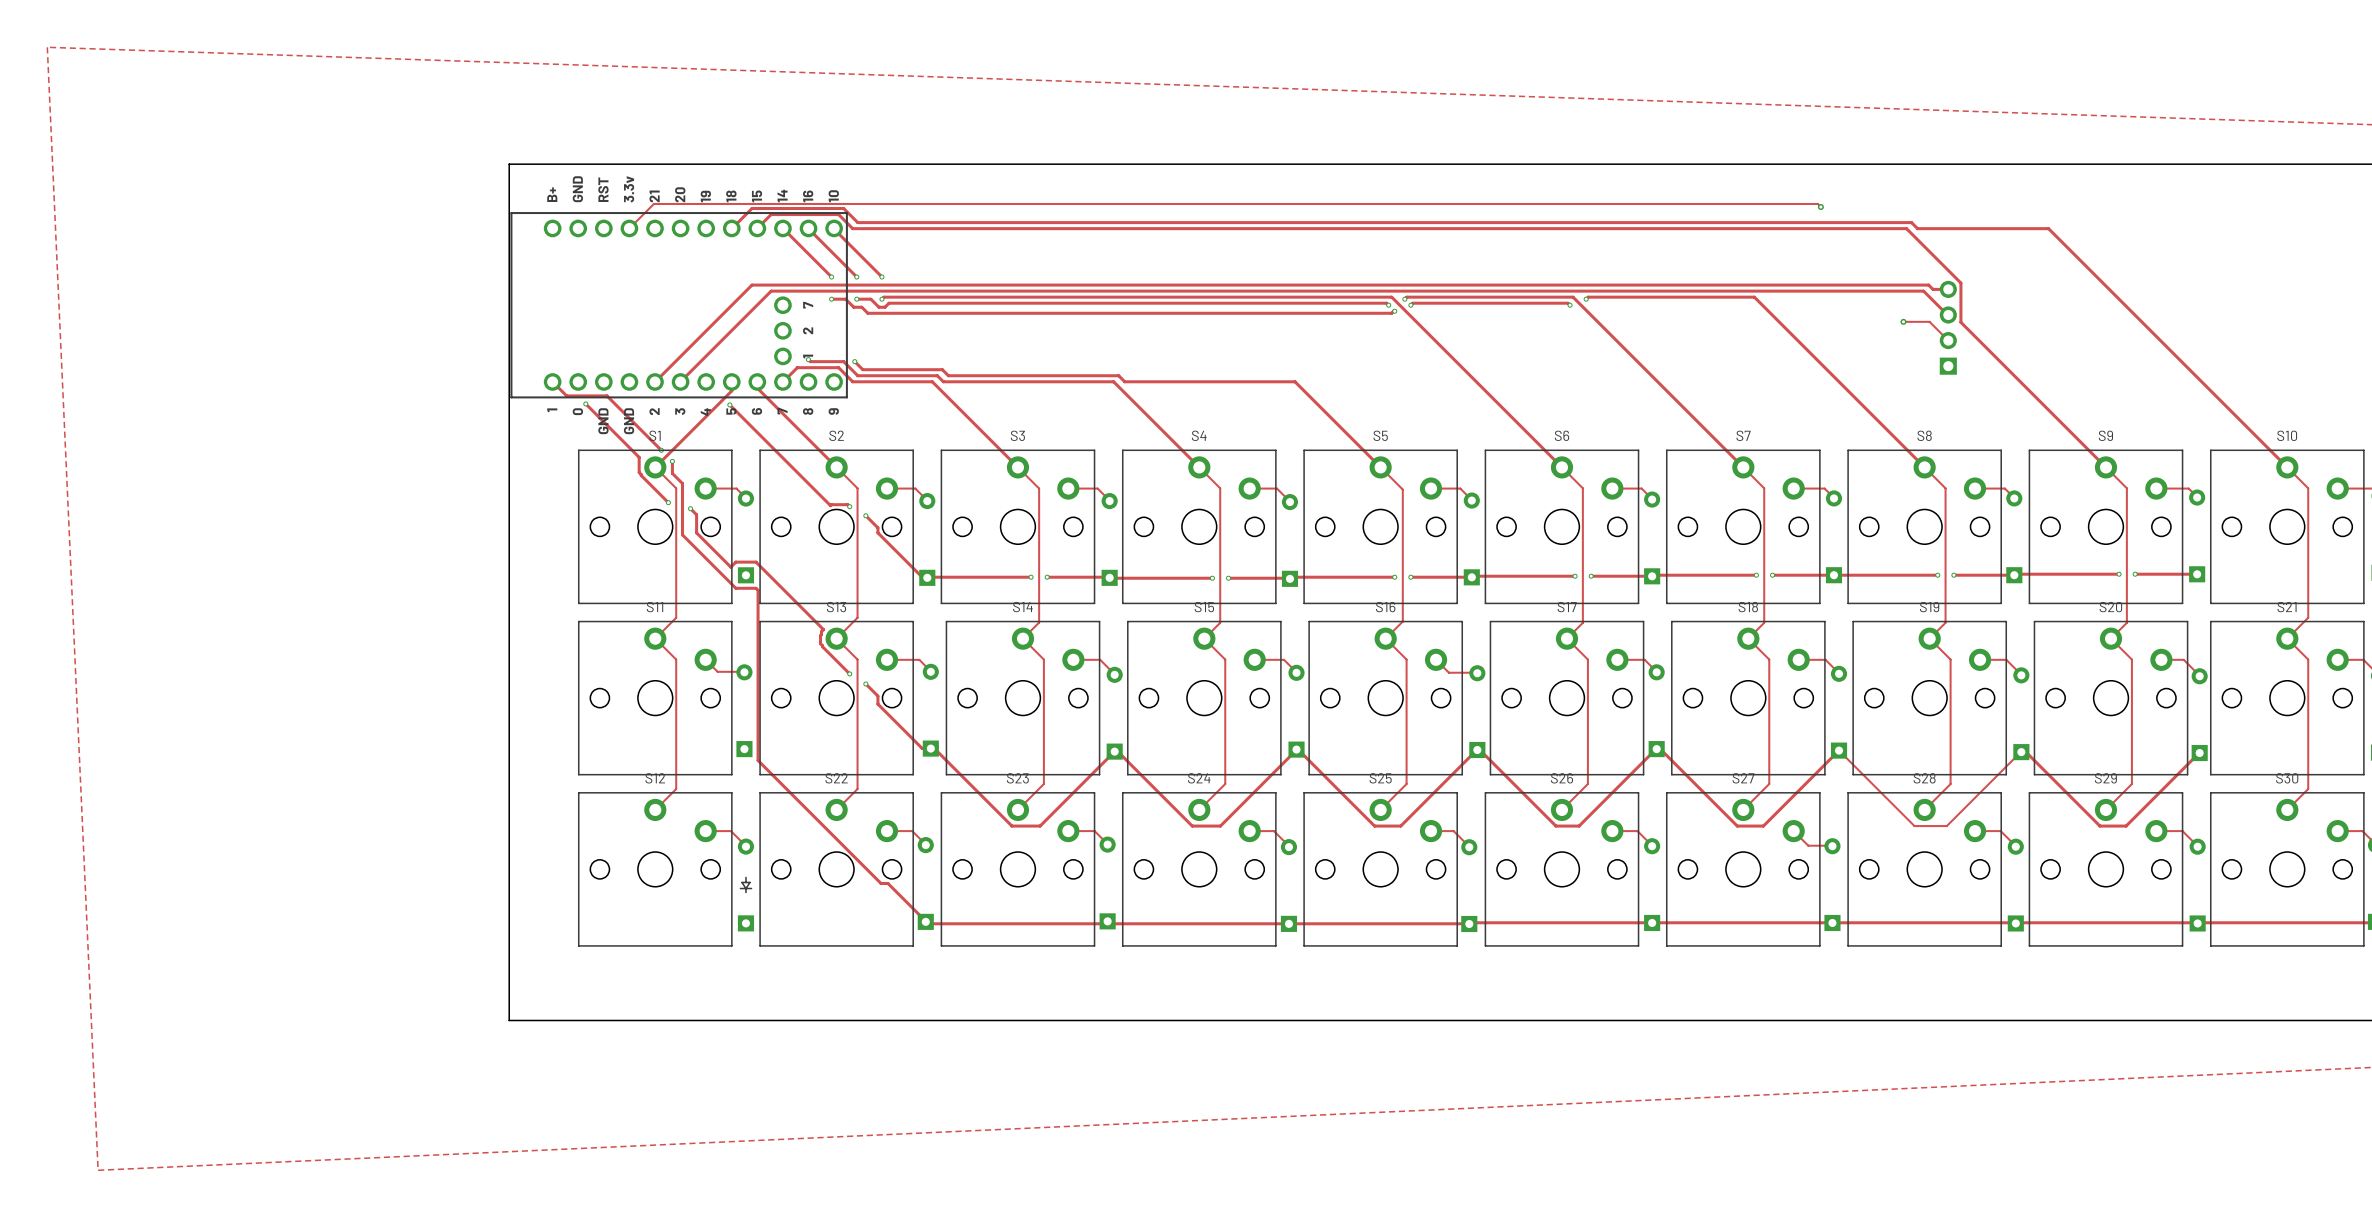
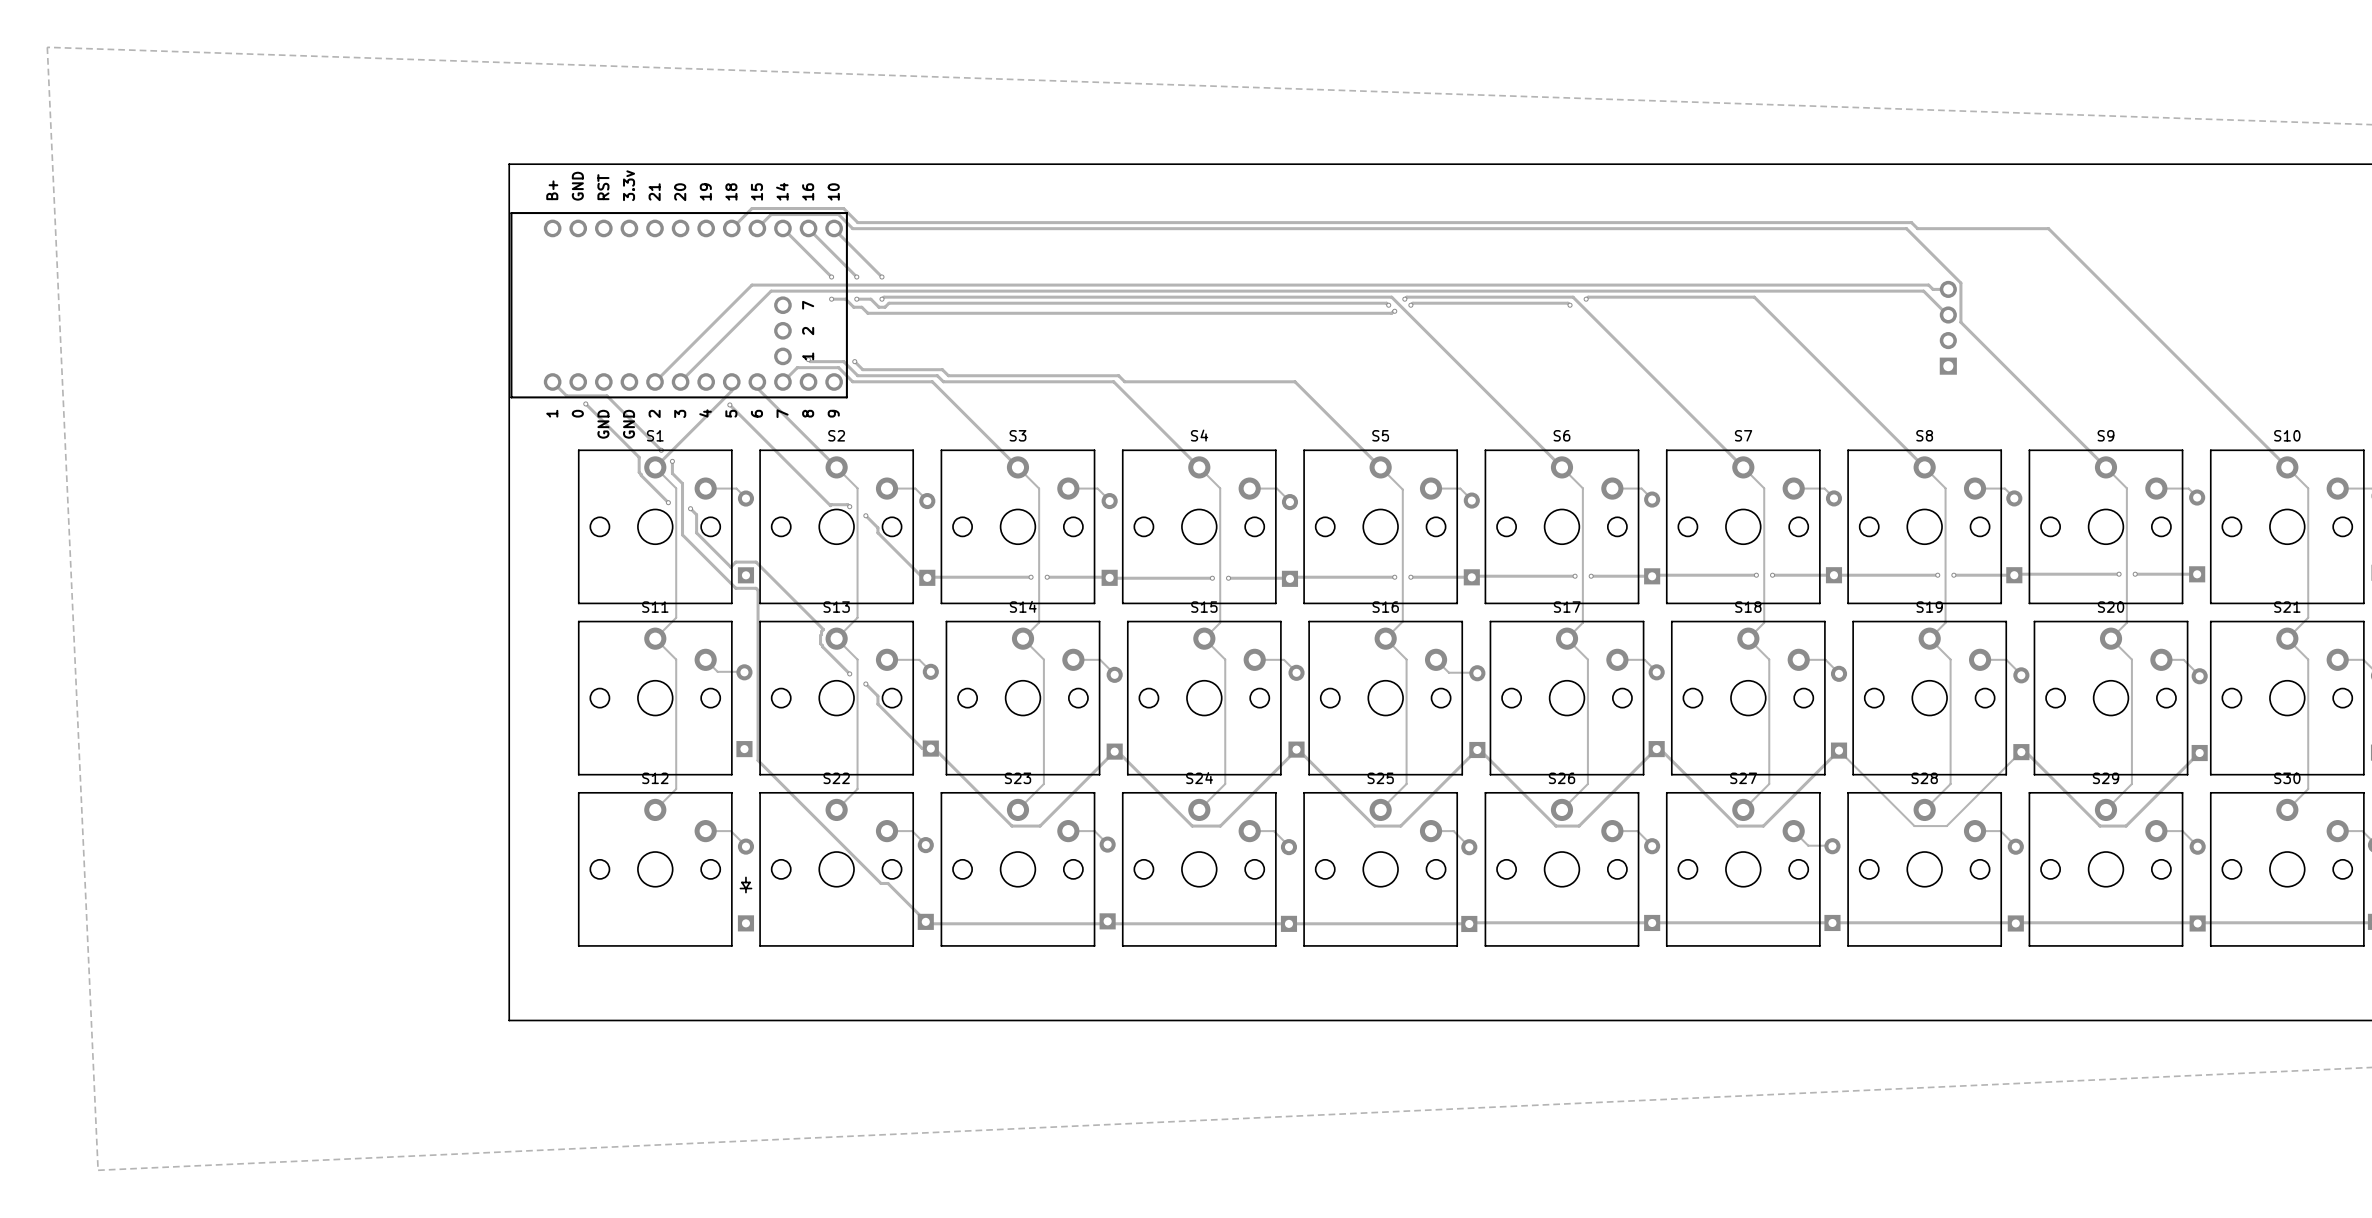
track: (1820, 206) (1817, 203) (653, 203) (629, 228) -> none
via: (1820, 206) -> none
track: (1903, 321) (1929, 321) (1948, 340) -> none
via: (1903, 321) -> none

